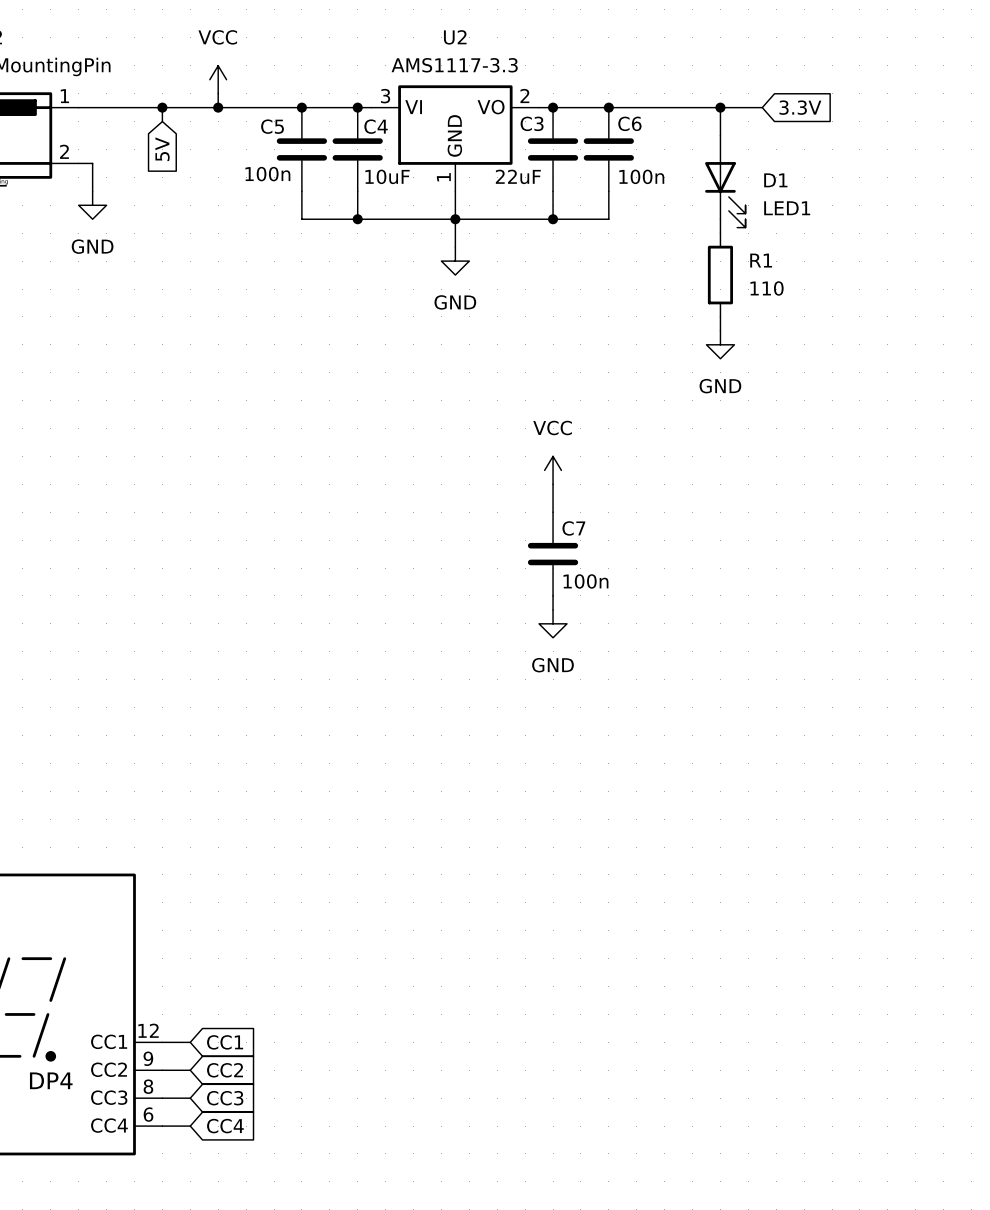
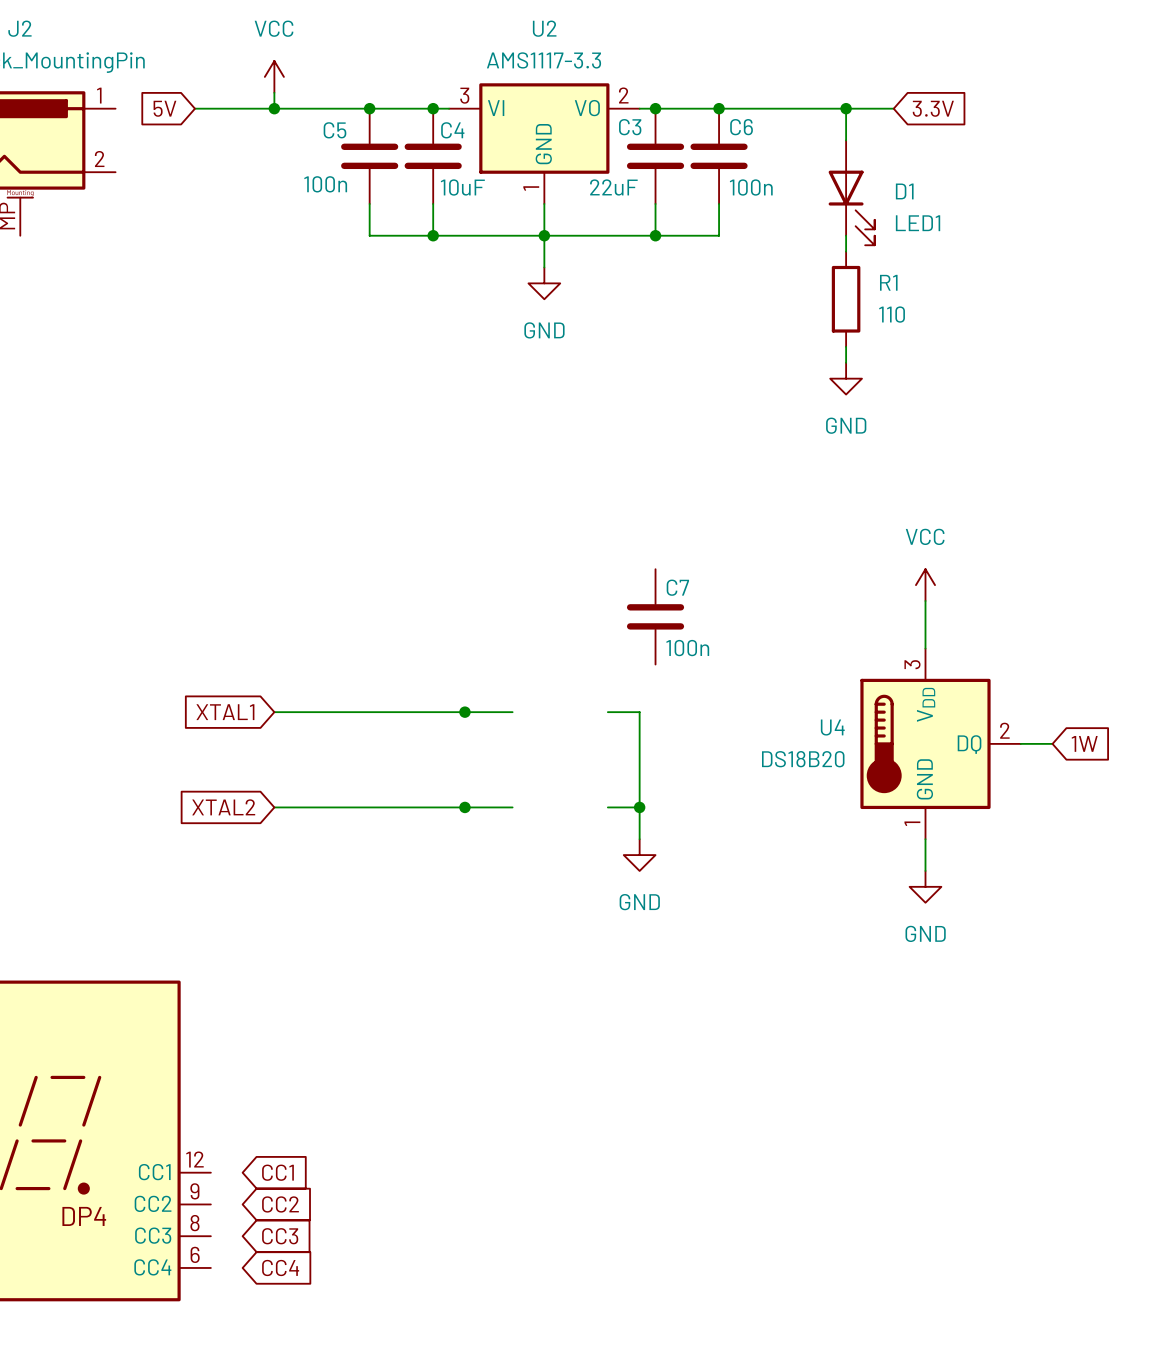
wire: (78, 107) (148, 107) -> none
wire: (162, 107) (162, 121) -> none
junction: (162, 107) -> none
global label rotation: 0° (162, 149) -> 90° clockwise (164, 108)
global label position: 5V (162, 149) -> 5V (164, 108)
wire: (78, 163) (92, 163) (92, 191) -> none
power symbol: GND (92, 205) -> none
power symbol position: VCC (553, 470) -> VCC (925, 585)
wire: (553, 484) (553, 512) -> none
wire: none -> (925, 600) (925, 648)
wire: (553, 595) (553, 609) -> none
power symbol position: GND (553, 623) -> GND (639, 855)
global label: none -> XTAL1 (225, 712)
wire: none -> (274, 712) (512, 712)
junction: none -> (464, 712)
wire: none -> (607, 712) (639, 712) (639, 839)
U4: none -> DS18B20 (940, 743)
wire: none -> (1020, 743) (1052, 743)
global label: none -> 1W (1084, 743)
global label: none -> XTAL2 (223, 807)
wire: none -> (274, 807) (512, 807)
junction: none -> (464, 807)
wire: none -> (607, 807) (639, 807)
junction: none -> (639, 807)
wire: none -> (925, 839) (925, 870)
power symbol: none -> GND (925, 886)
wire: (162, 1042) (190, 1042) -> none
wire: (162, 1070) (190, 1070) -> none
wire: (162, 1098) (190, 1098) -> none
wire: (162, 1126) (190, 1126) -> none

